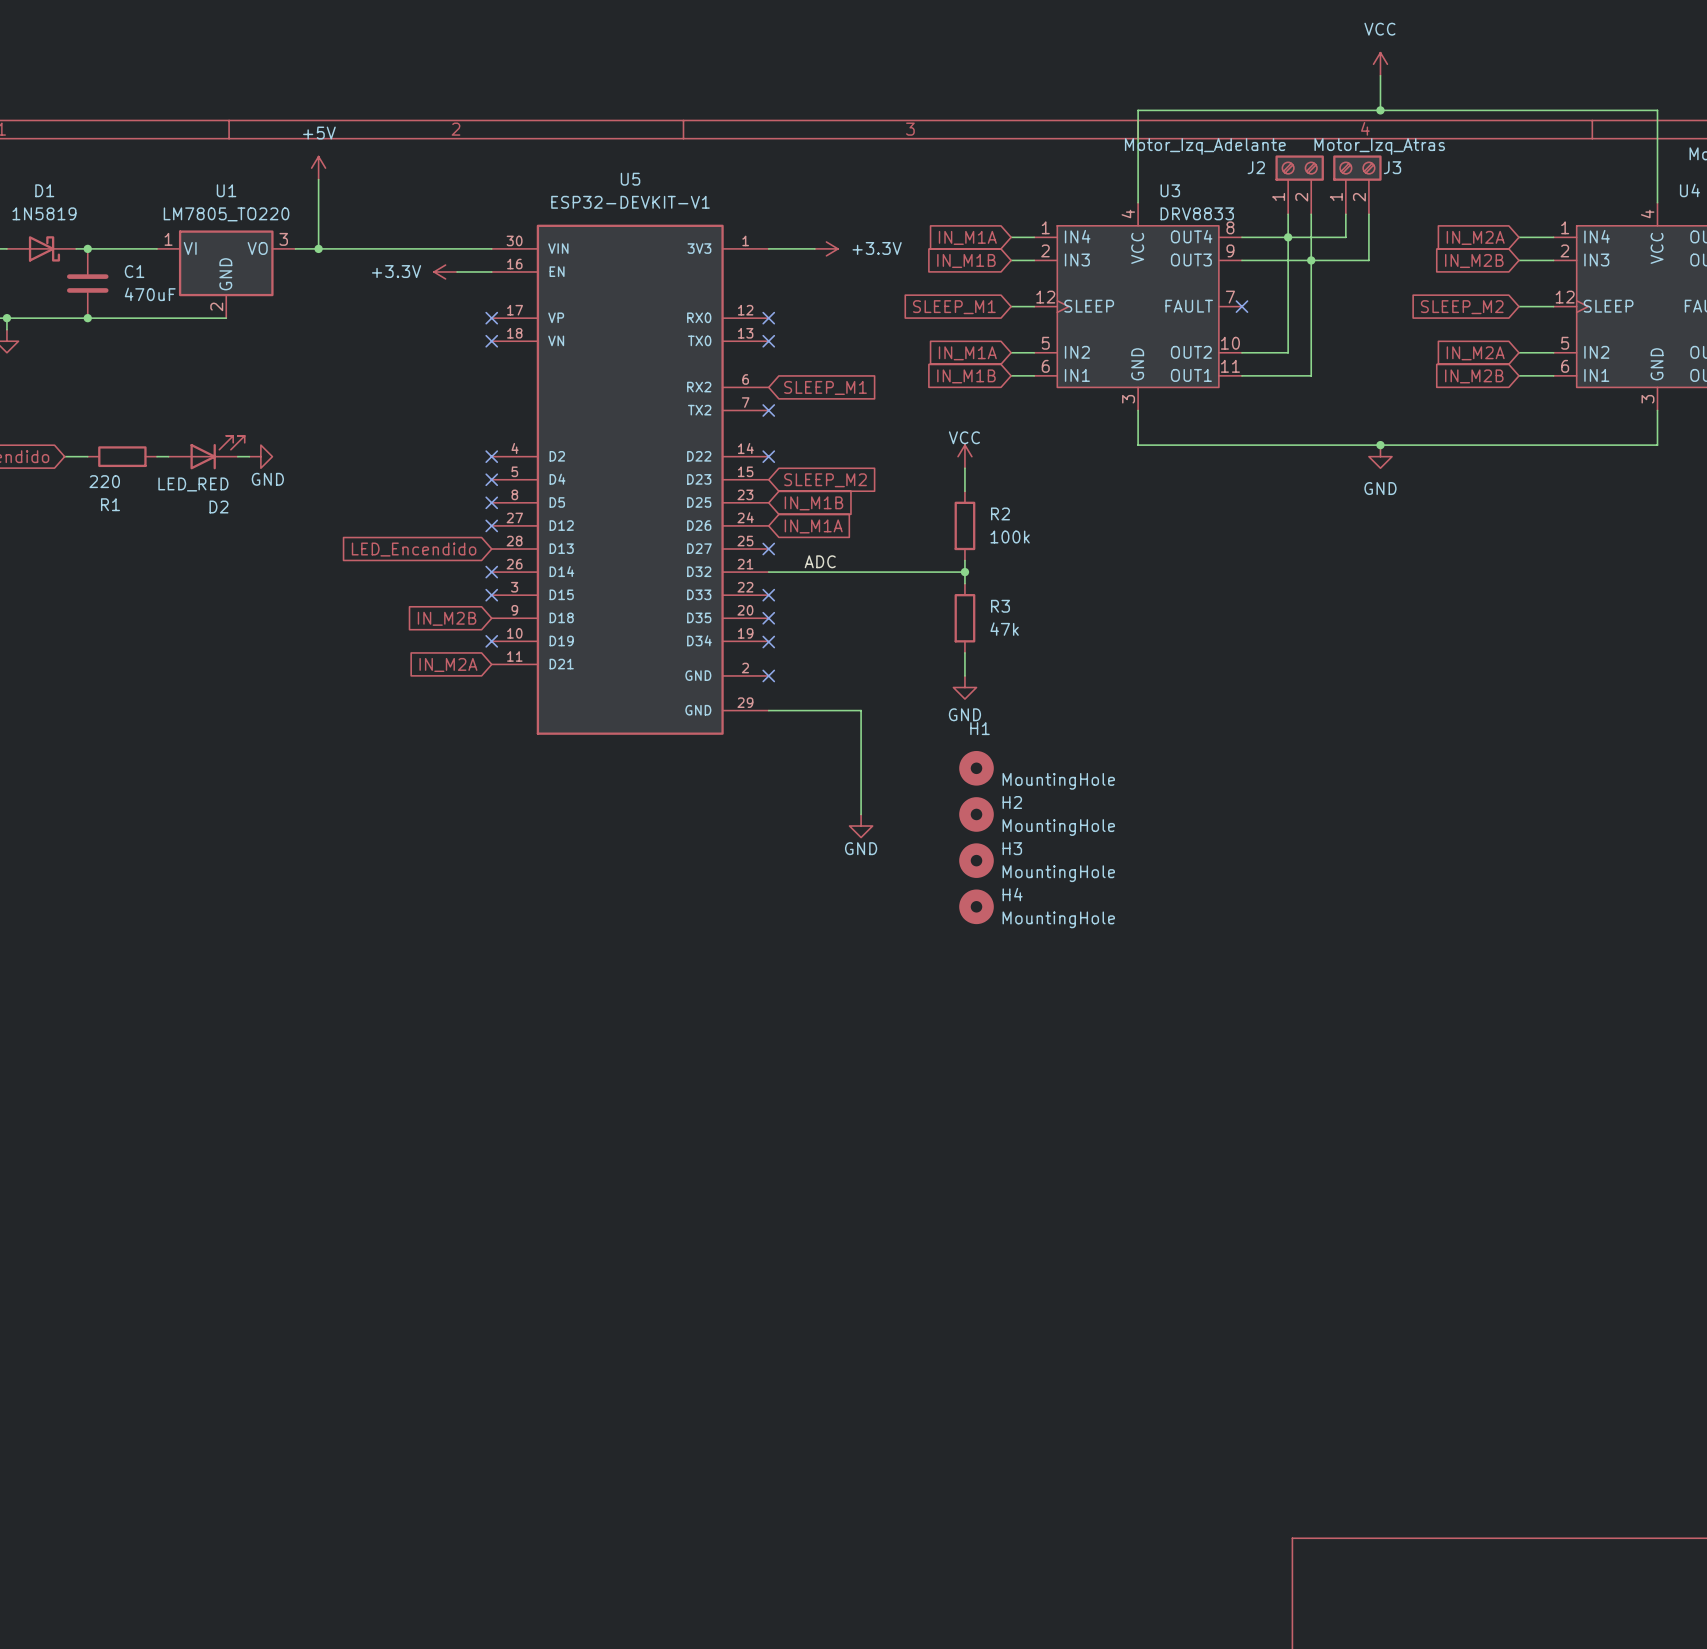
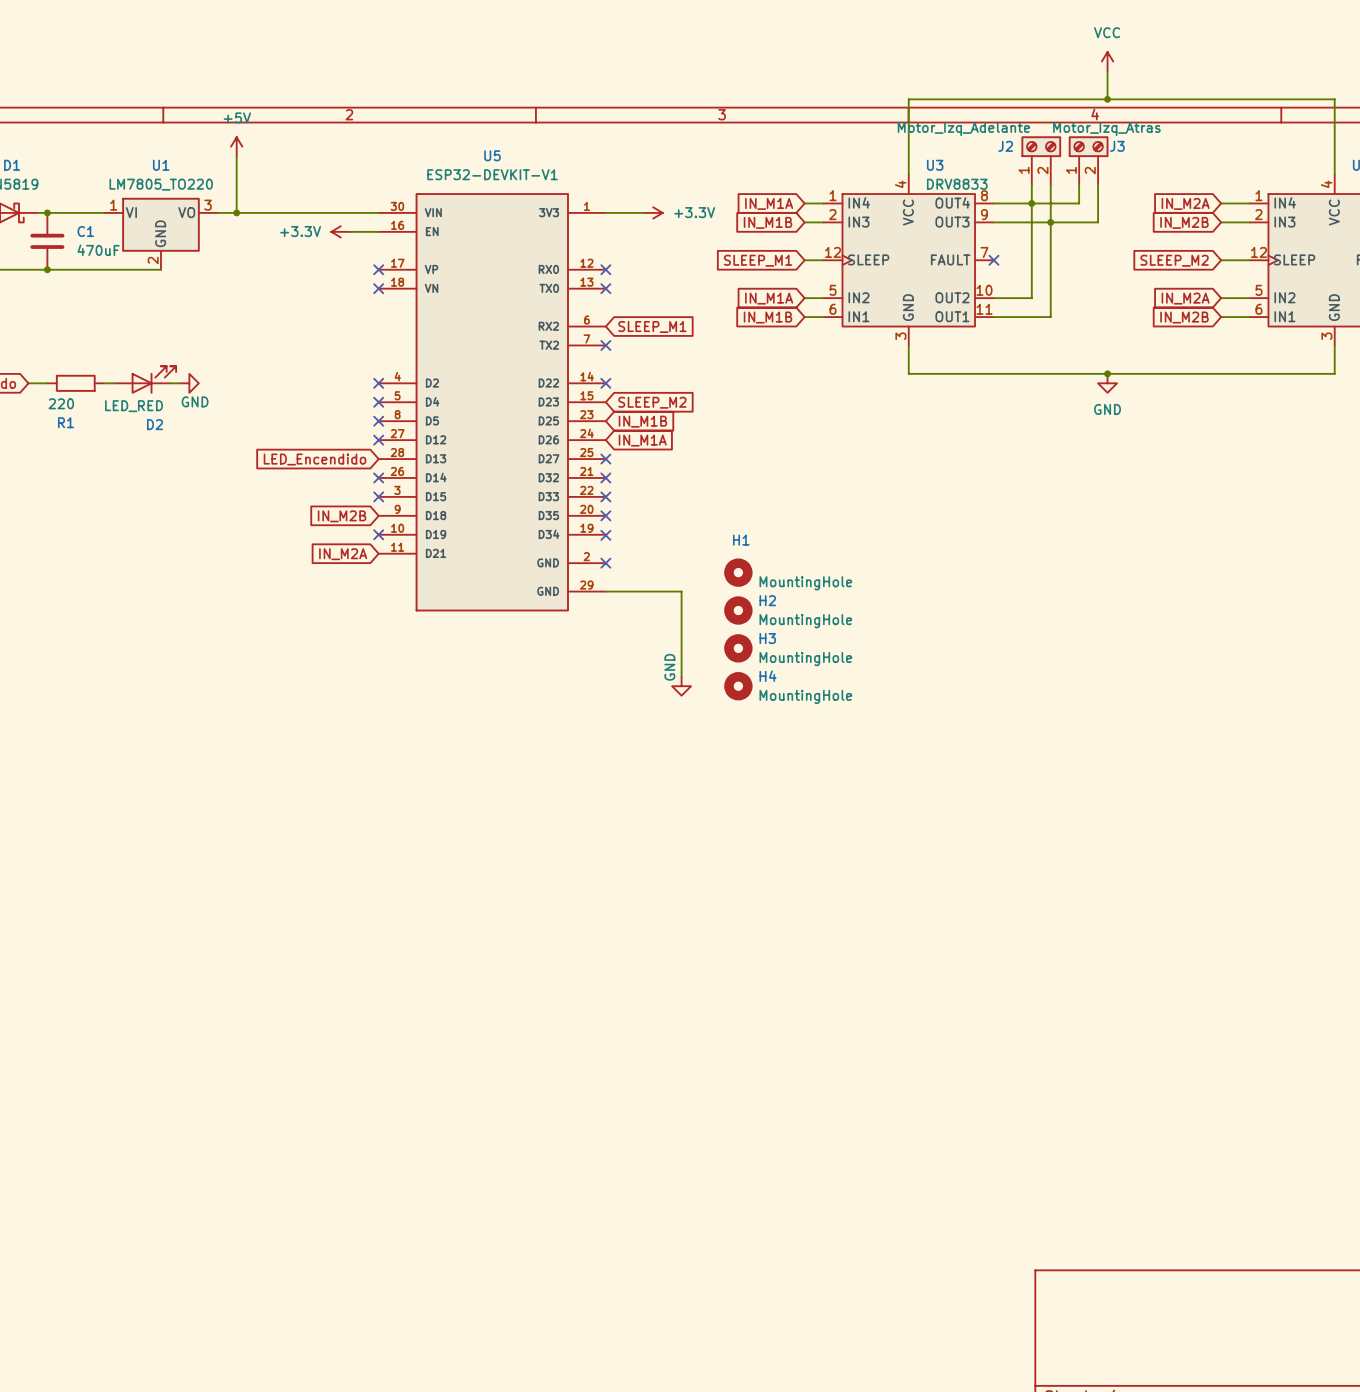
power symbol: VCC (964, 456) -> none
wire: (964, 468) (964, 491) -> none
R2: 100k (964, 525) -> none
wire: (964, 560) (964, 583) -> none
label: ADC (820, 561) -> none
wire: (768, 572) (964, 572) -> none
no-connect mark: none -> (605, 477)
junction: (964, 572) -> none
R3: 47k (964, 618) -> none
wire: (964, 652) (964, 675) -> none
power symbol: GND (964, 687) -> none
H1 position: (976, 768) -> (738, 572)
H2 position: (976, 814) -> (738, 610)
power symbol text rotation: 0° (861, 848) -> 90° counterclockwise (669, 667)
power symbol text position: GND (861, 848) -> GND (669, 667)
H3 position: (976, 860) -> (738, 648)
H4 position: (976, 906) -> (738, 686)

